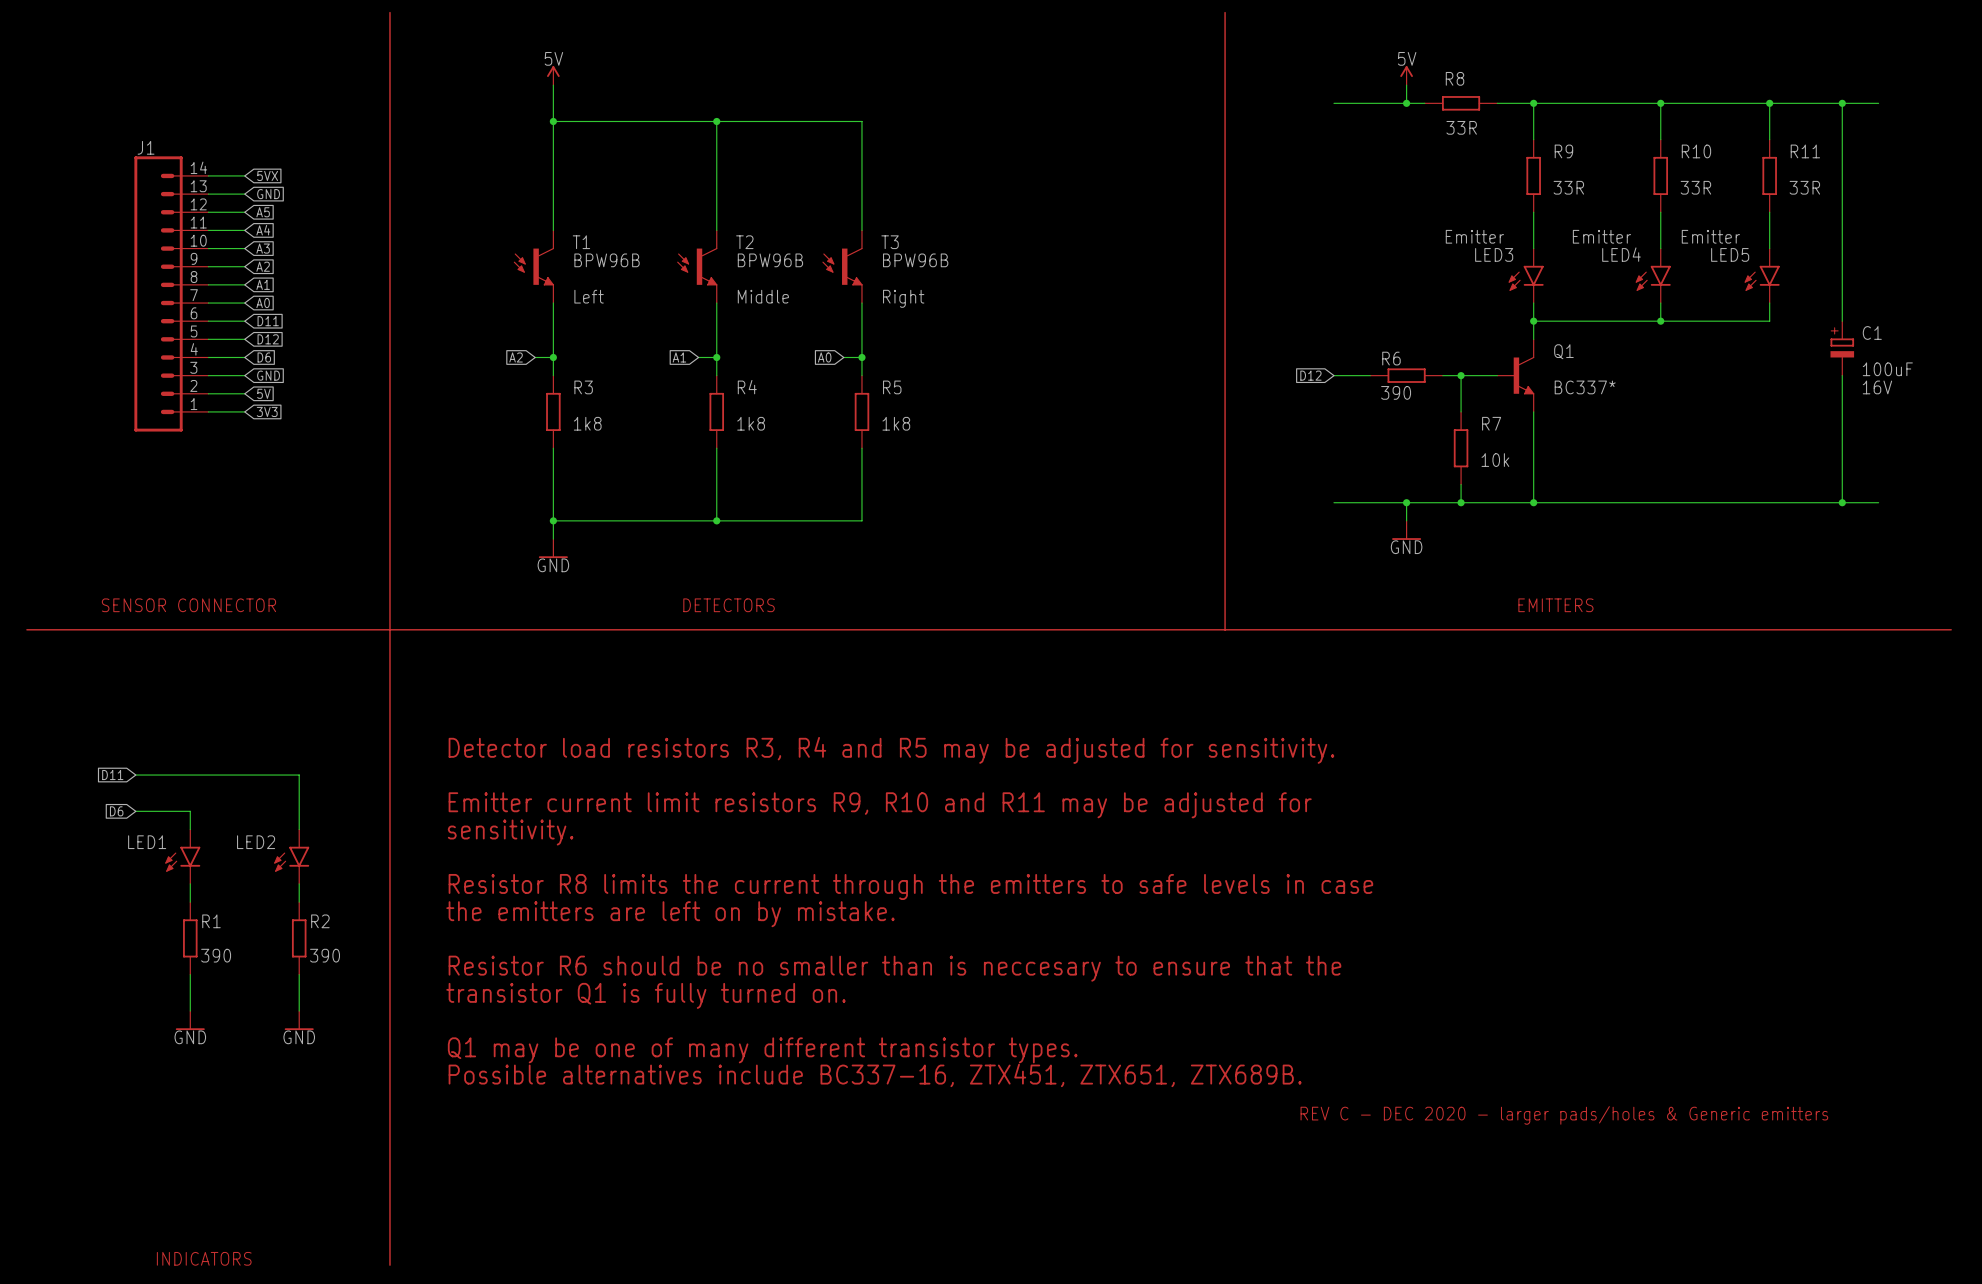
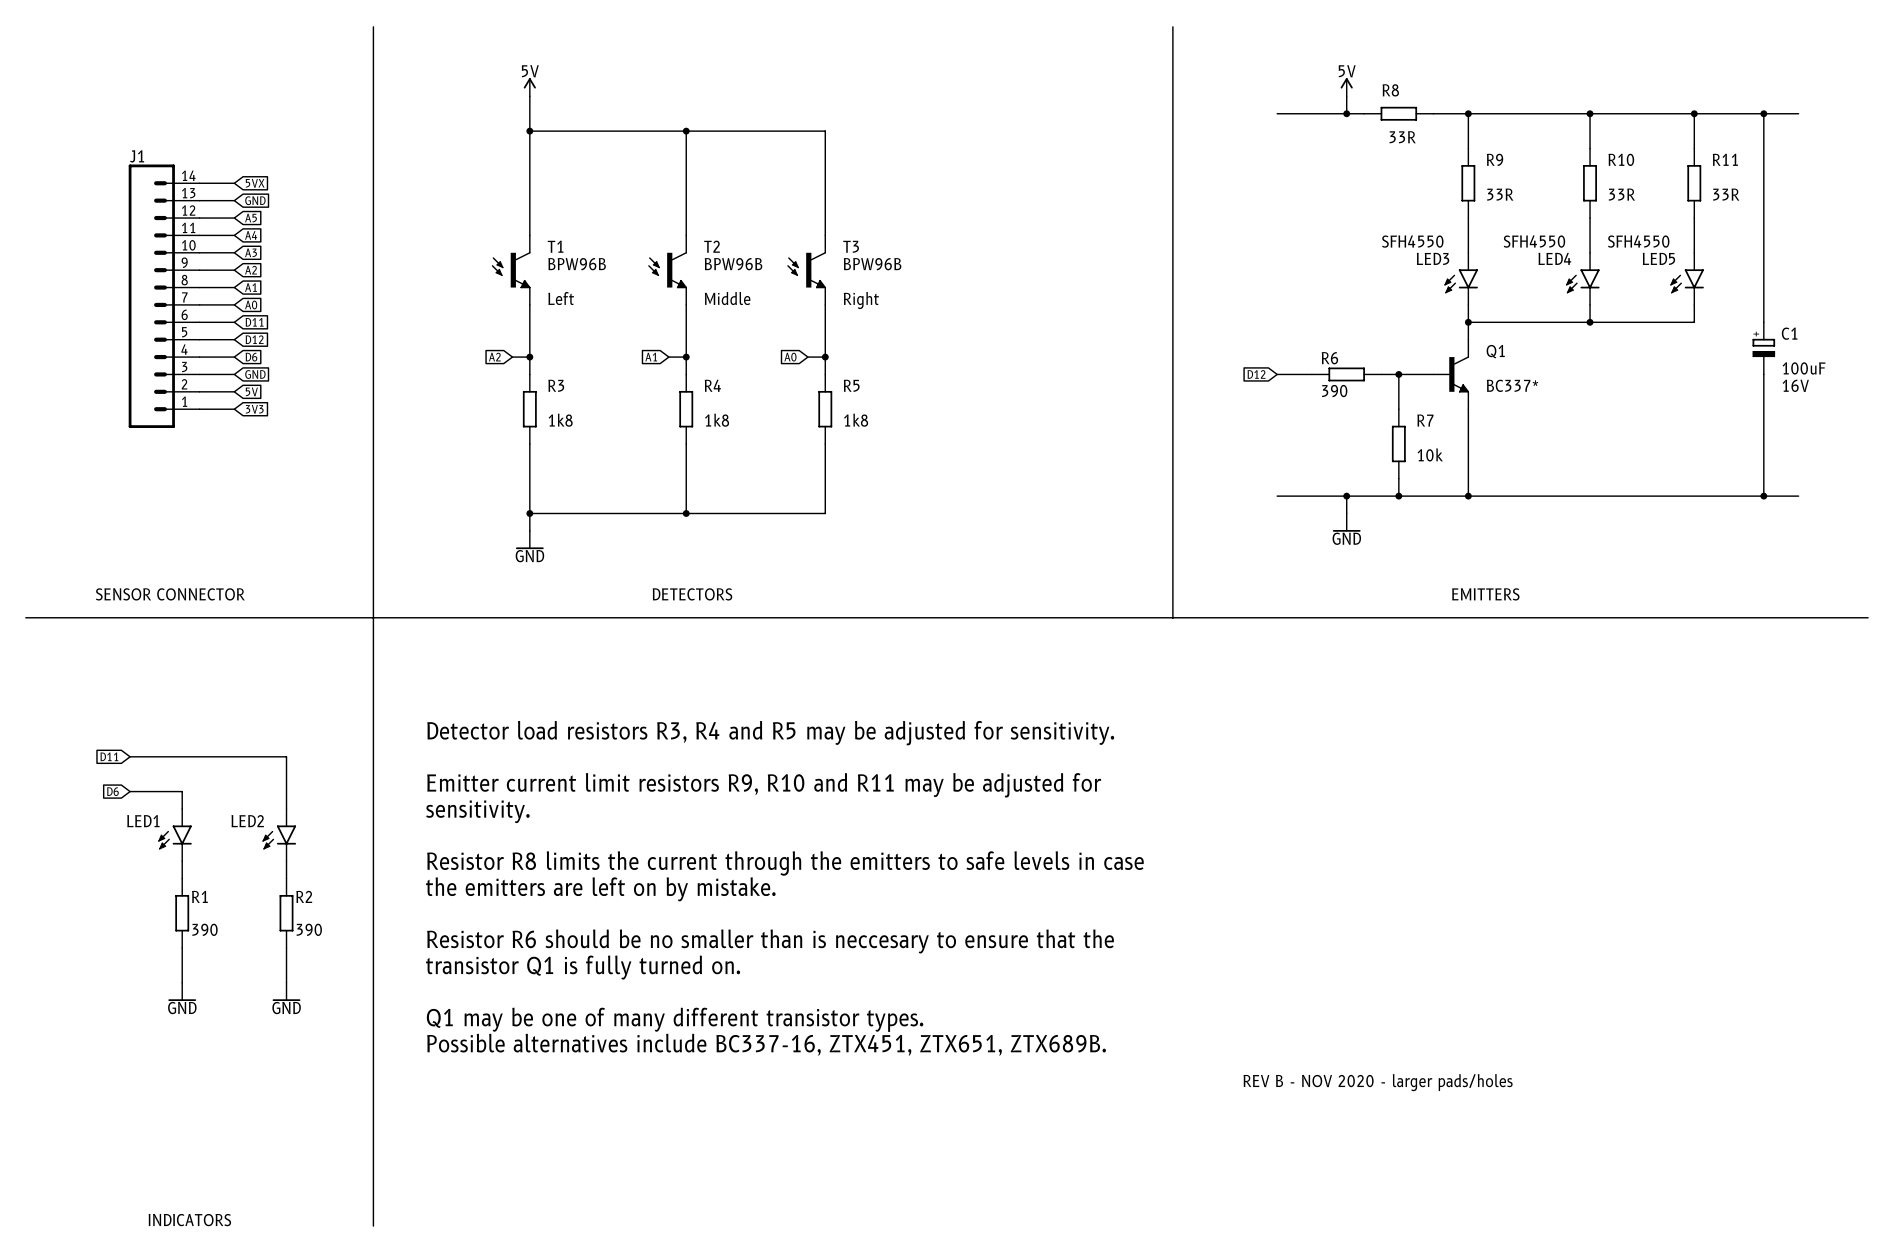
LED3 value: Emitter (1474, 236) -> SFH4550 (1412, 241)
LED4 value: Emitter (1601, 236) -> SFH4550 (1534, 241)
LED5 value: Emitter (1710, 236) -> SFH4550 (1638, 241)
text: REV C - DEC 2020 - larger pads/holes & Generic emitters (1564, 1115) -> REV B - NOV 2020 - larger pads/holes (1378, 1082)

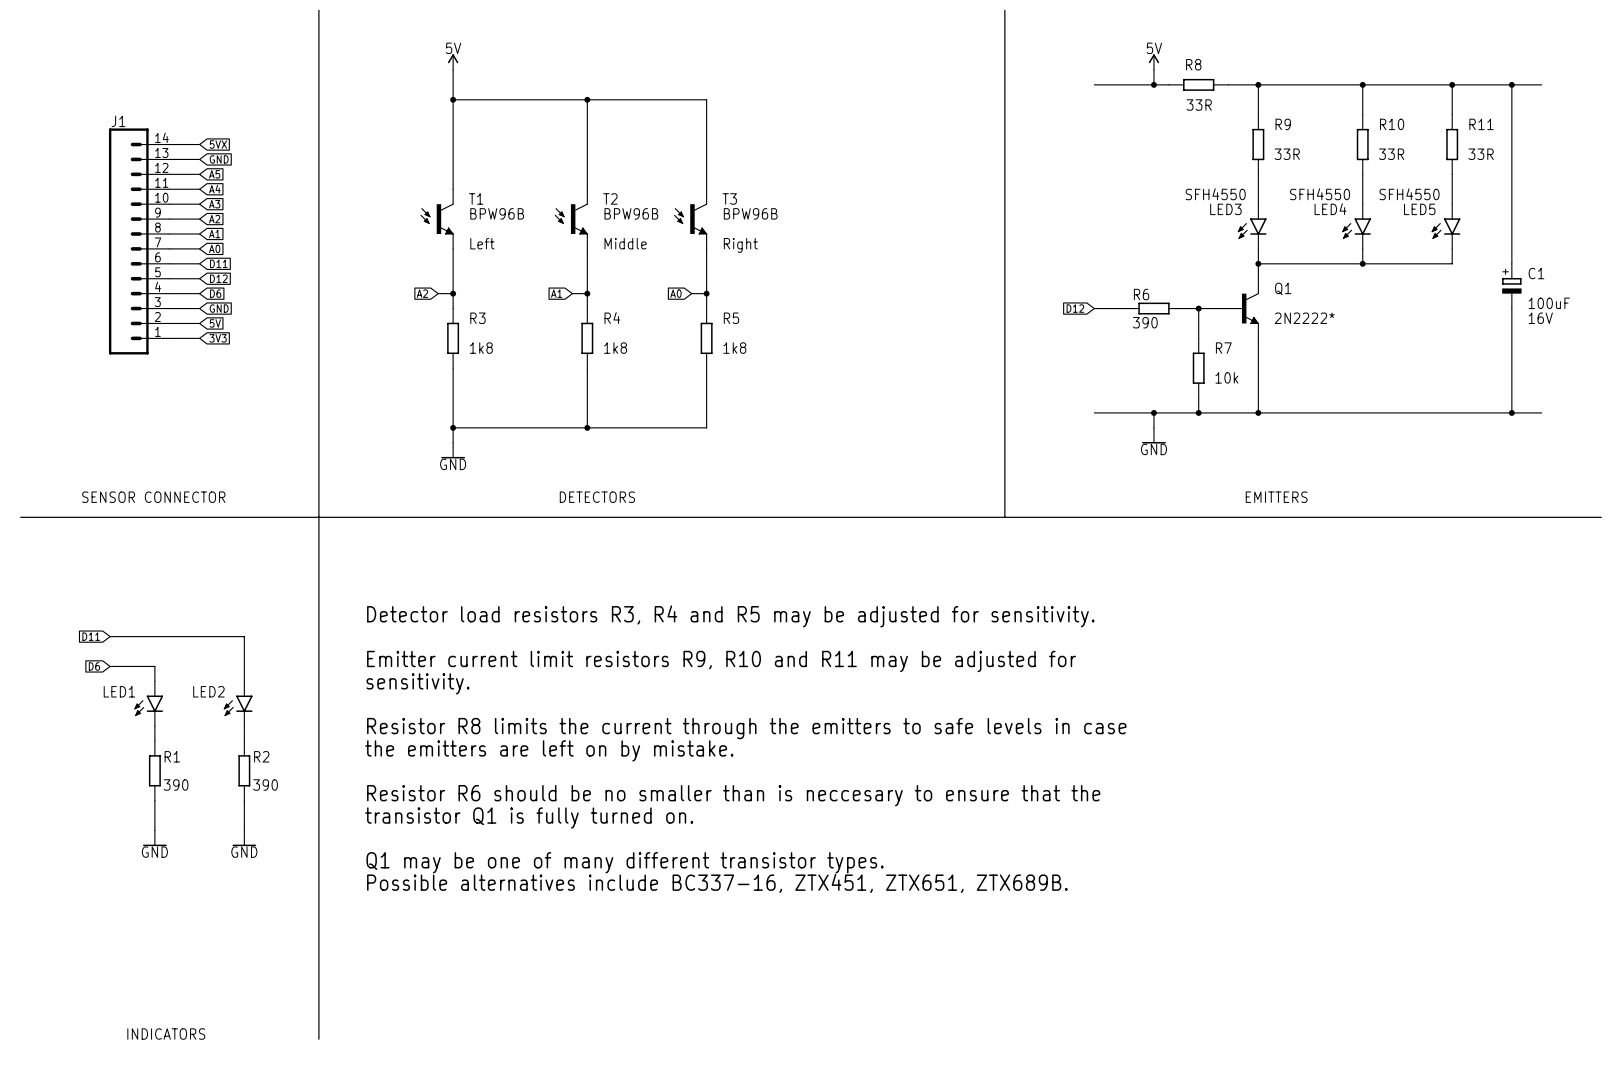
Q1 value: BC337* (1512, 385) -> 2N2222* (1304, 318)
text: REV B - NOV 2020 - larger pads/holes (1378, 1082) -> none

